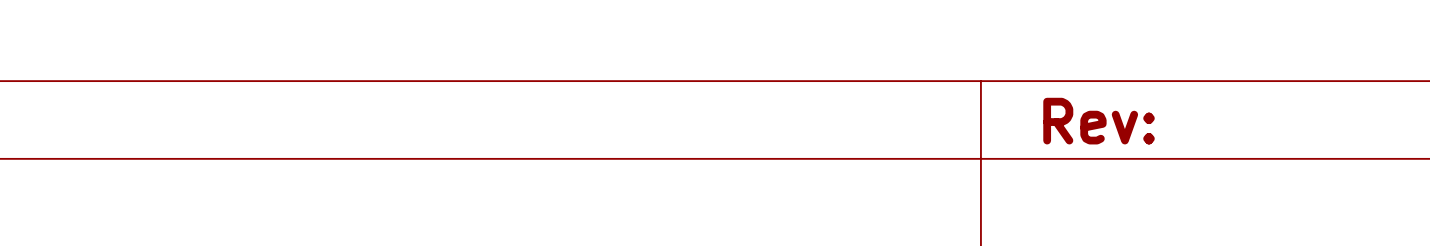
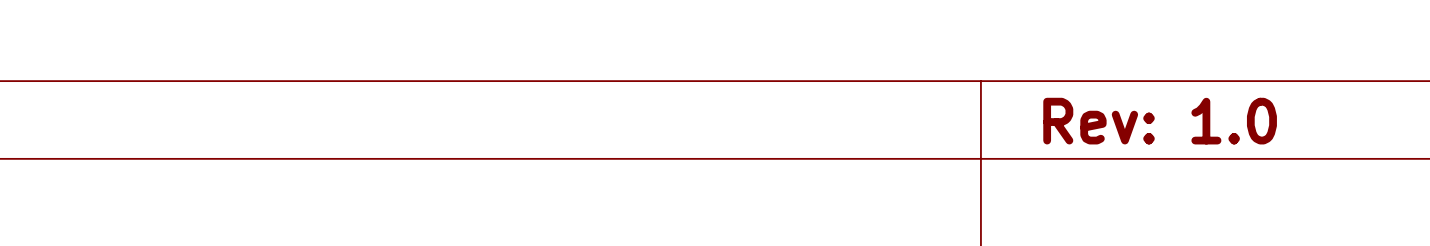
title block: Rev: (1099, 121) -> Rev: 1.0 (1160, 121)

